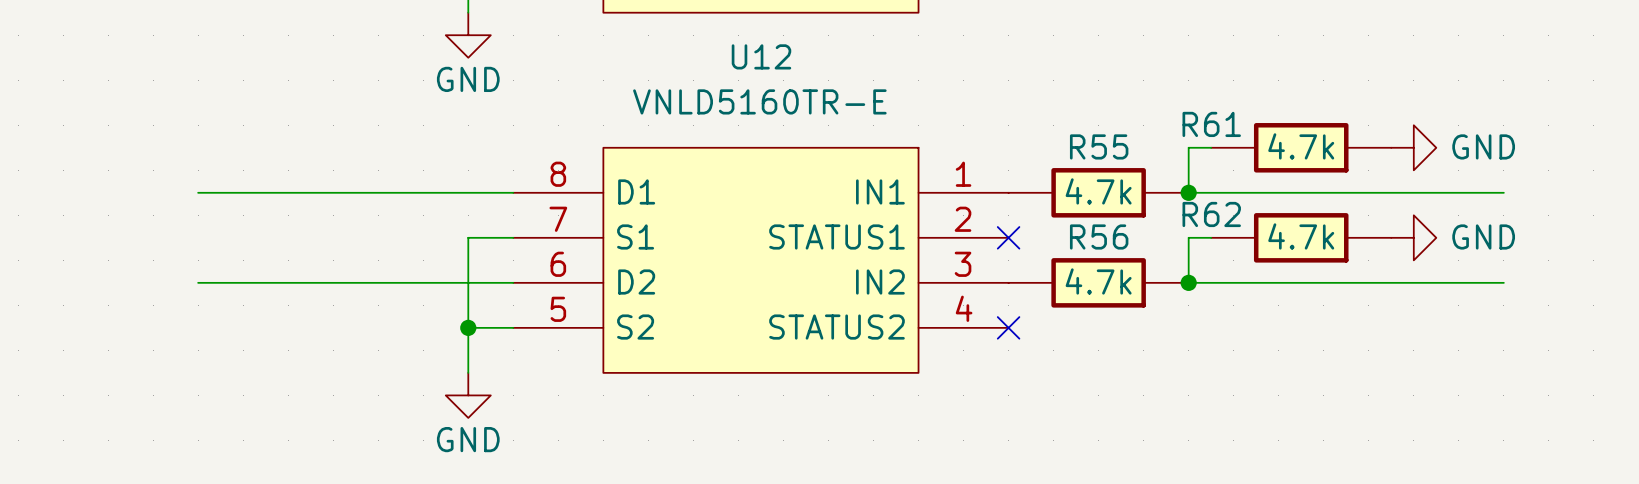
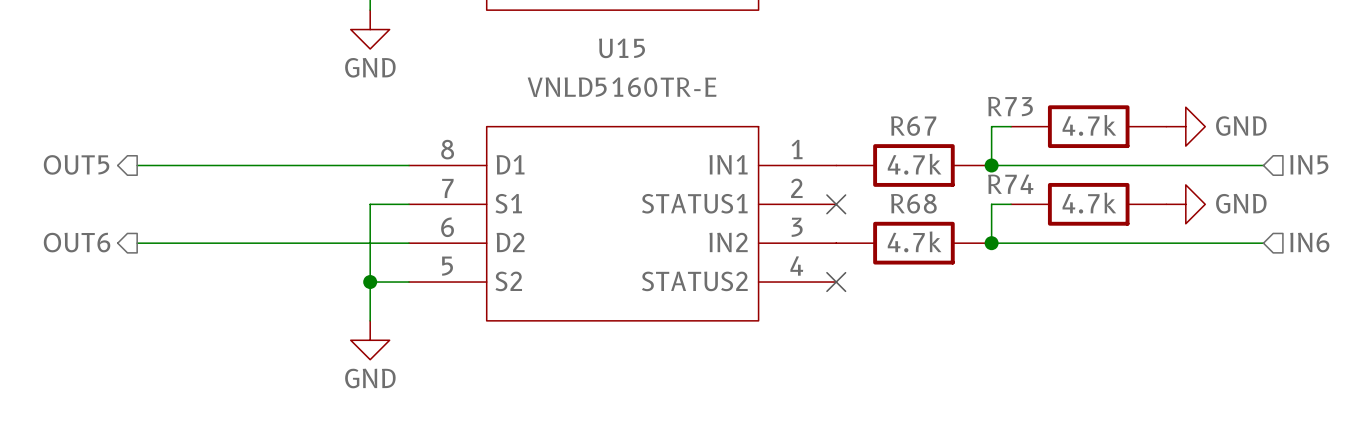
U12 name: U12 (761, 56) -> U15 (622, 48)
R61 name: R61 (1211, 124) -> R73 (1010, 106)
R55 name: R55 (1099, 146) -> R67 (913, 126)
hierarchical label: none -> OUT5 (76, 164)
hierarchical label: none -> IN5 (1309, 164)
R62 name: R62 (1211, 214) -> R74 (1010, 184)
R56 name: R56 (1099, 236) -> R68 (913, 203)
hierarchical label: none -> OUT6 (77, 242)
hierarchical label: none -> IN6 (1309, 242)

